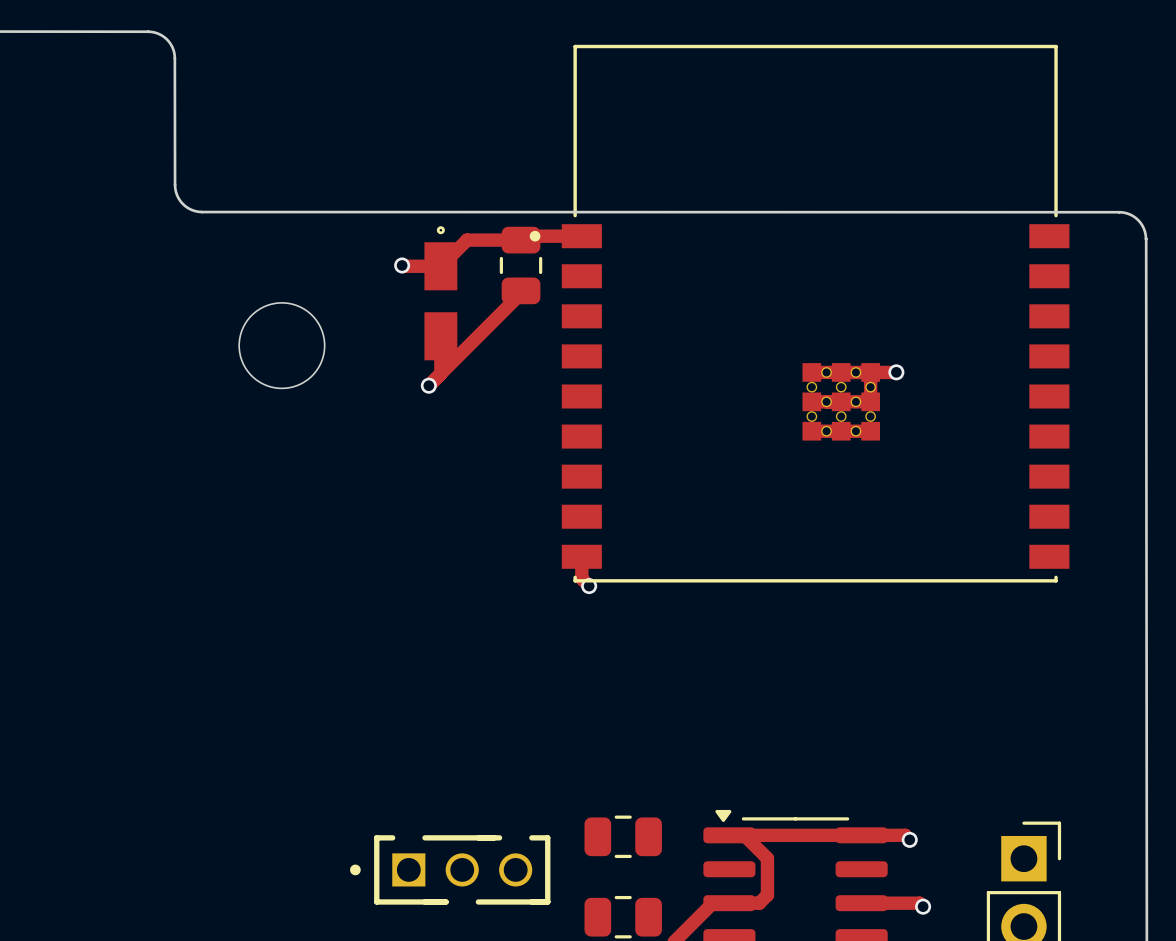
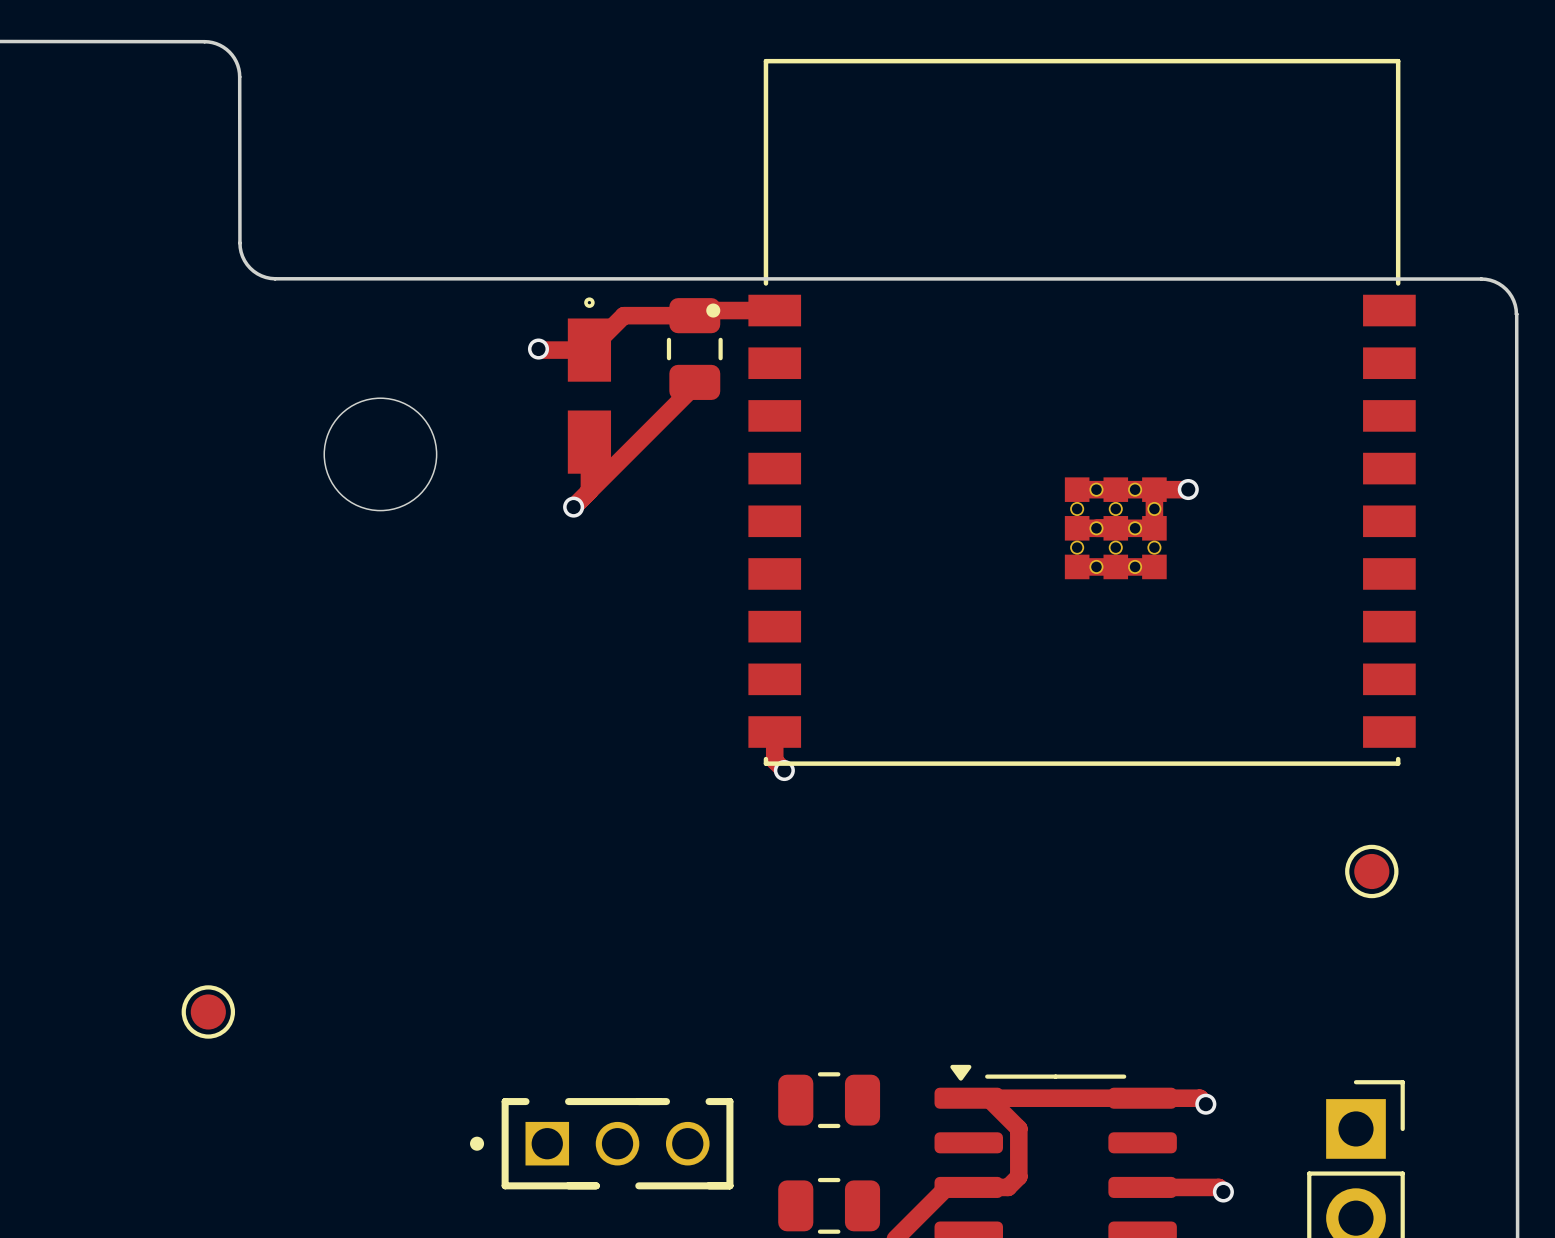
part: none -> (1371, 871)
part: none -> (208, 1011)

